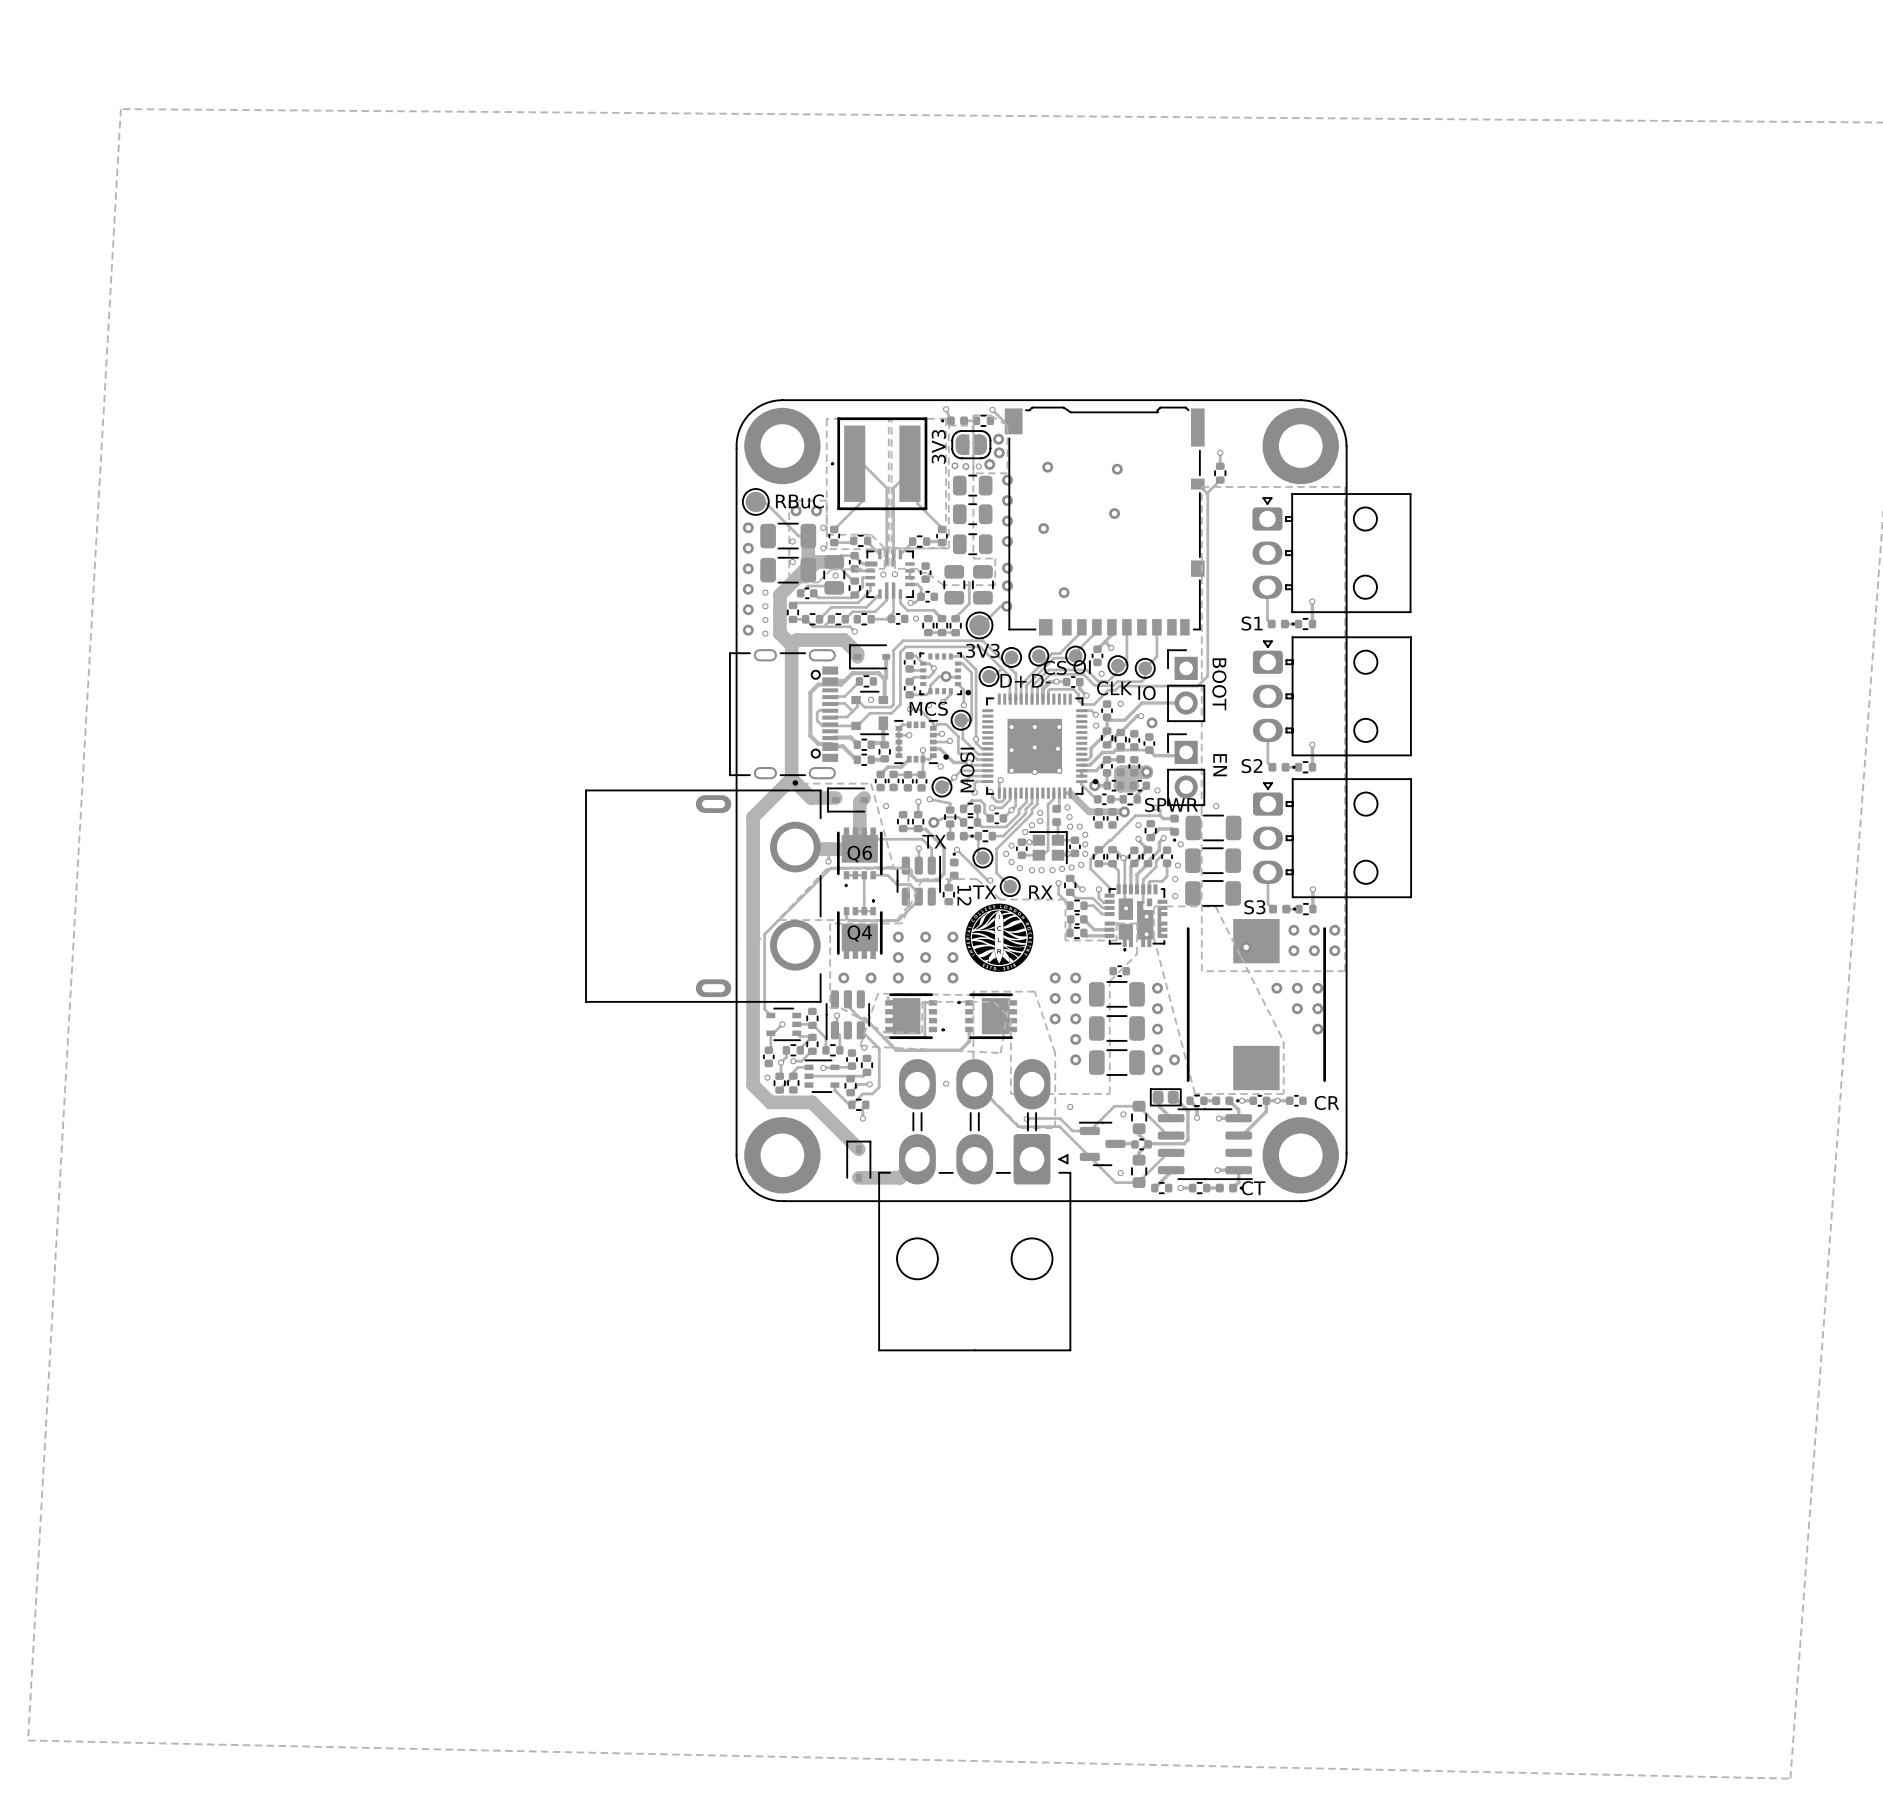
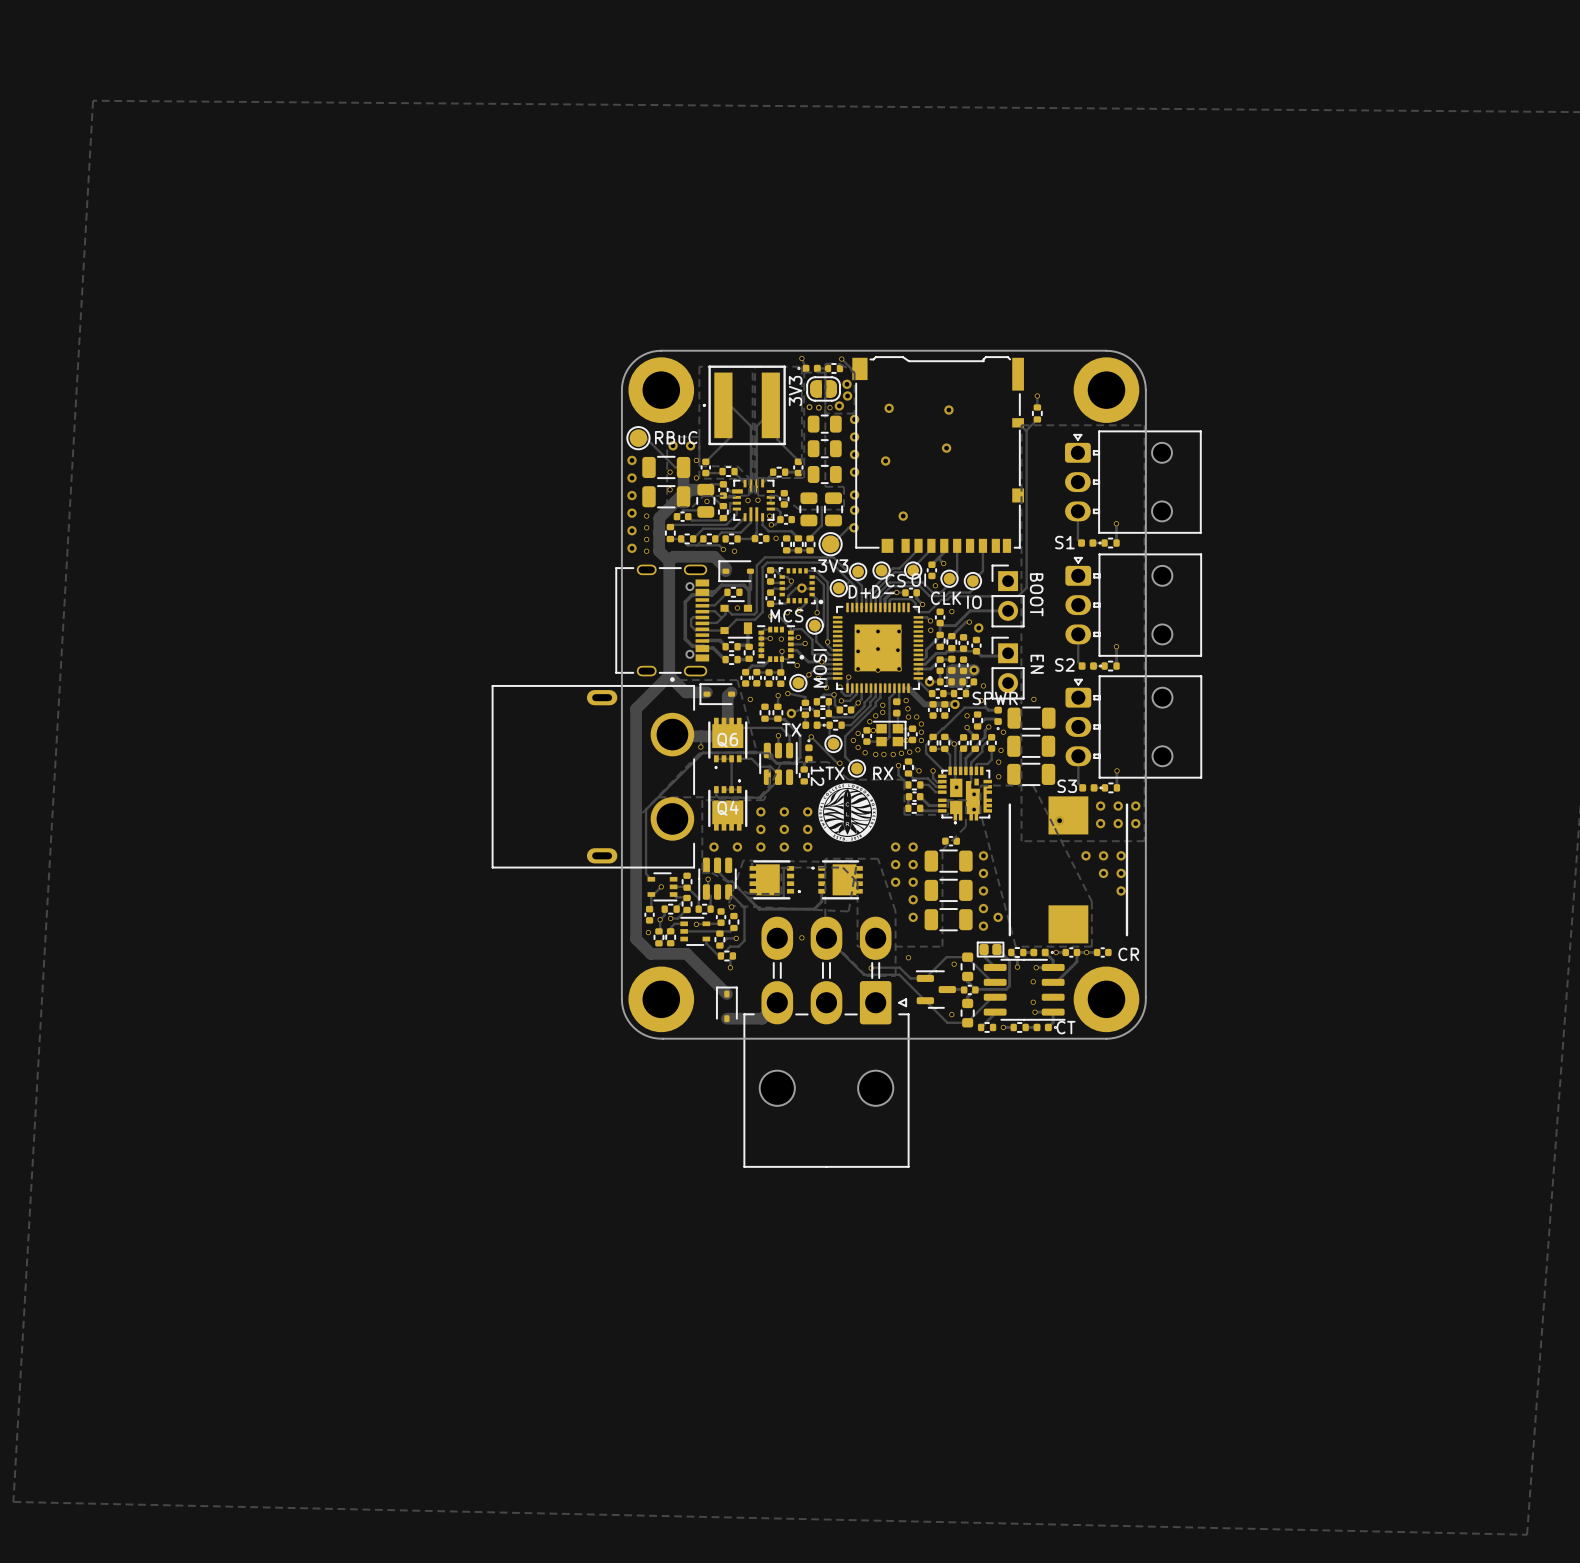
via: none -> (769, 516)
via: none -> (734, 551)
via: none -> (781, 639)
via: none -> (834, 694)
via: none -> (1033, 981)
via: none -> (1033, 1002)

